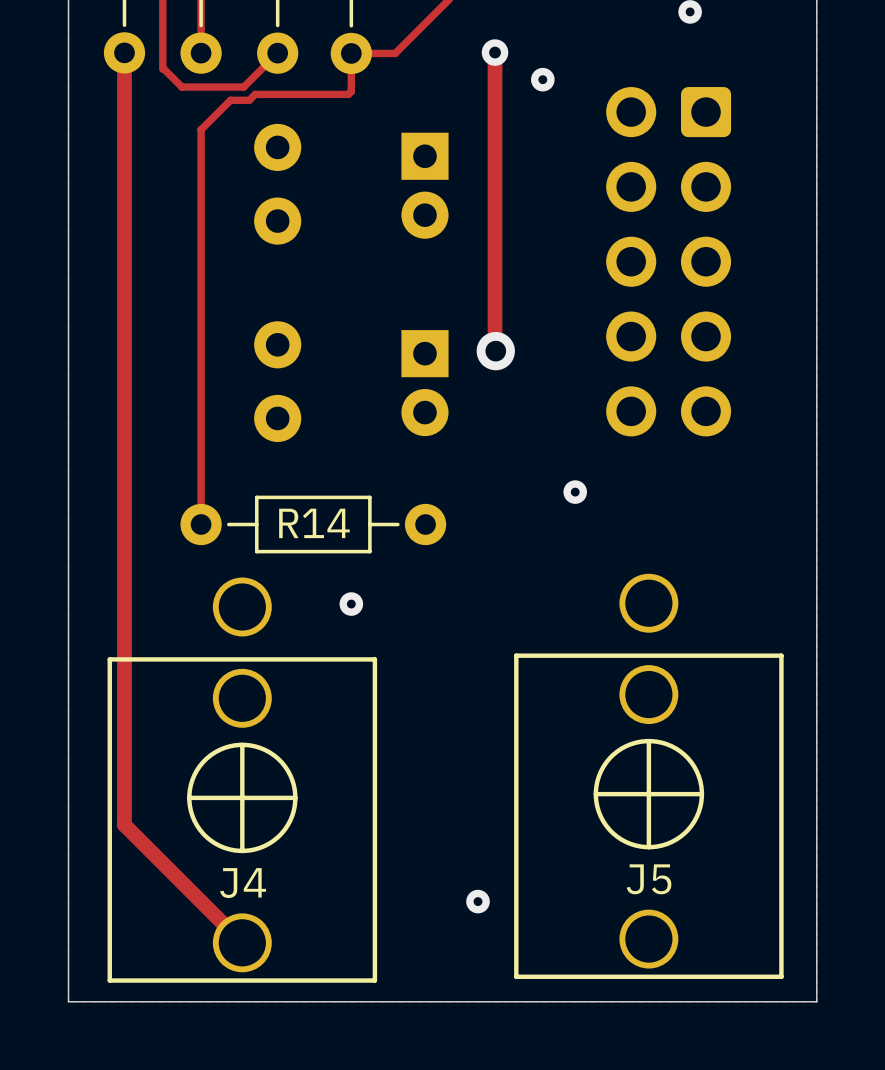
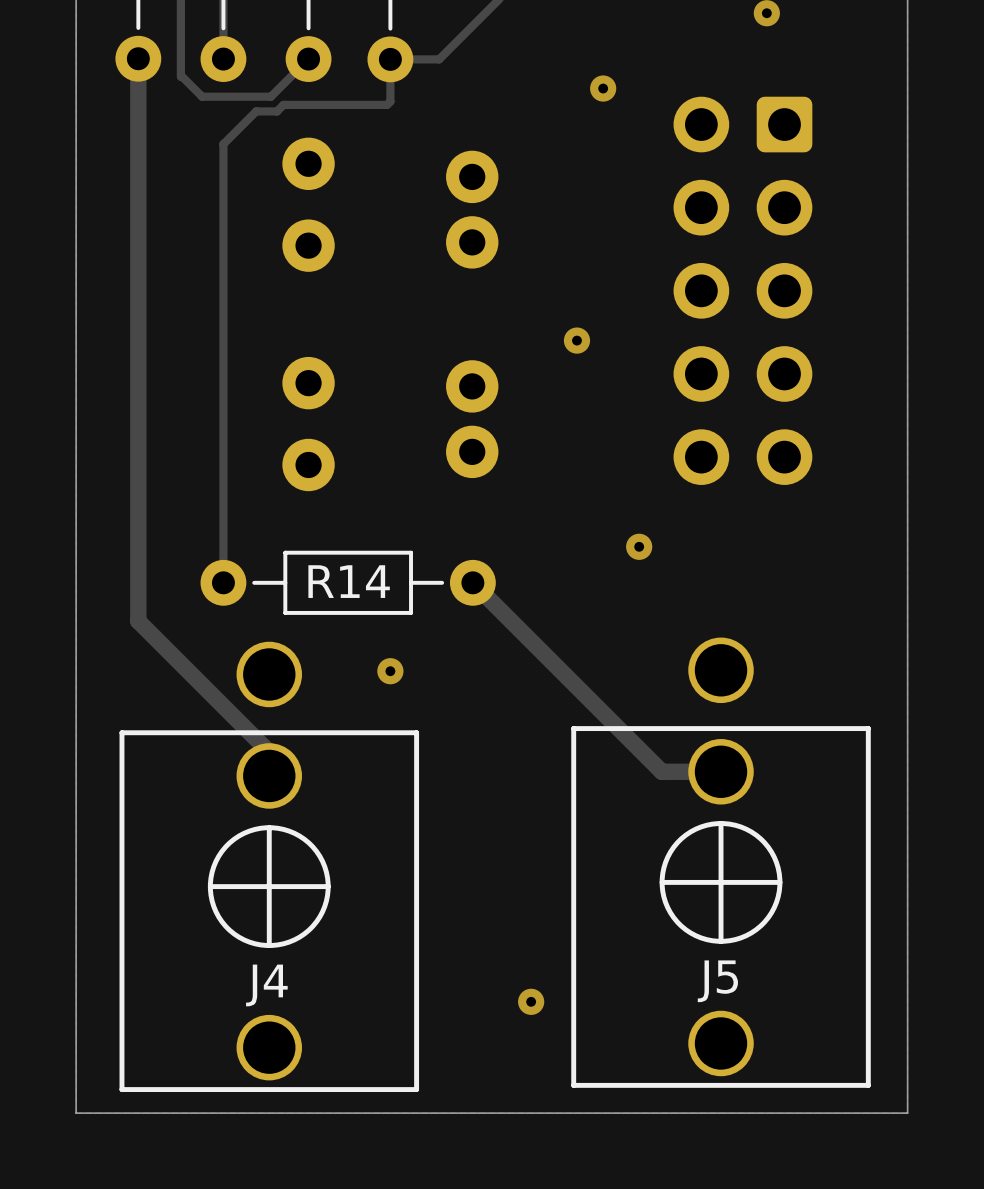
track: (495, 52) (495, 351) -> none
via: (495, 52) -> none
part footprint: [401, 132, 449, 239] -> [446, 150, 499, 269]
via: none -> (576, 340)
part footprint: [401, 330, 449, 437] -> [446, 360, 499, 479]
via: (495, 351) -> none
track: none -> (472, 582) (661, 771) (721, 771)
track: (124, 559) (124, 824) (242, 942) -> (138, 621) (275, 758)

